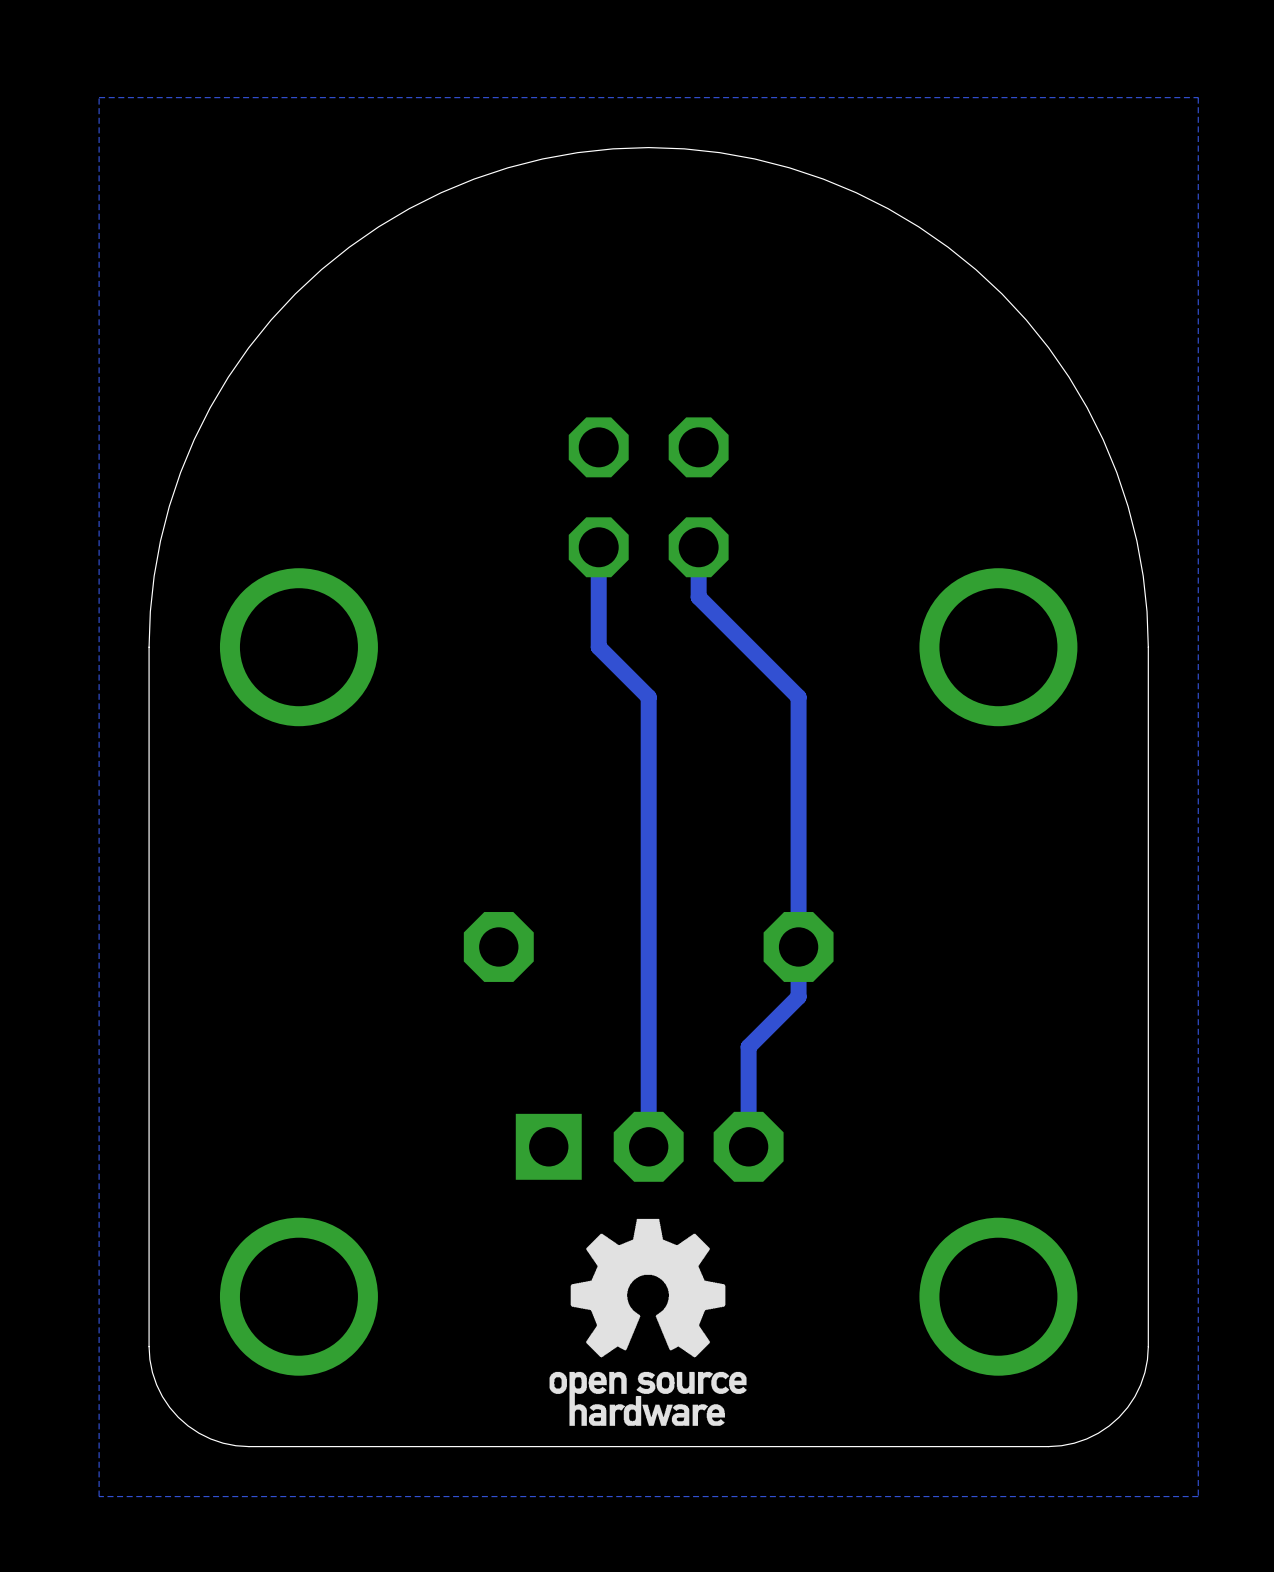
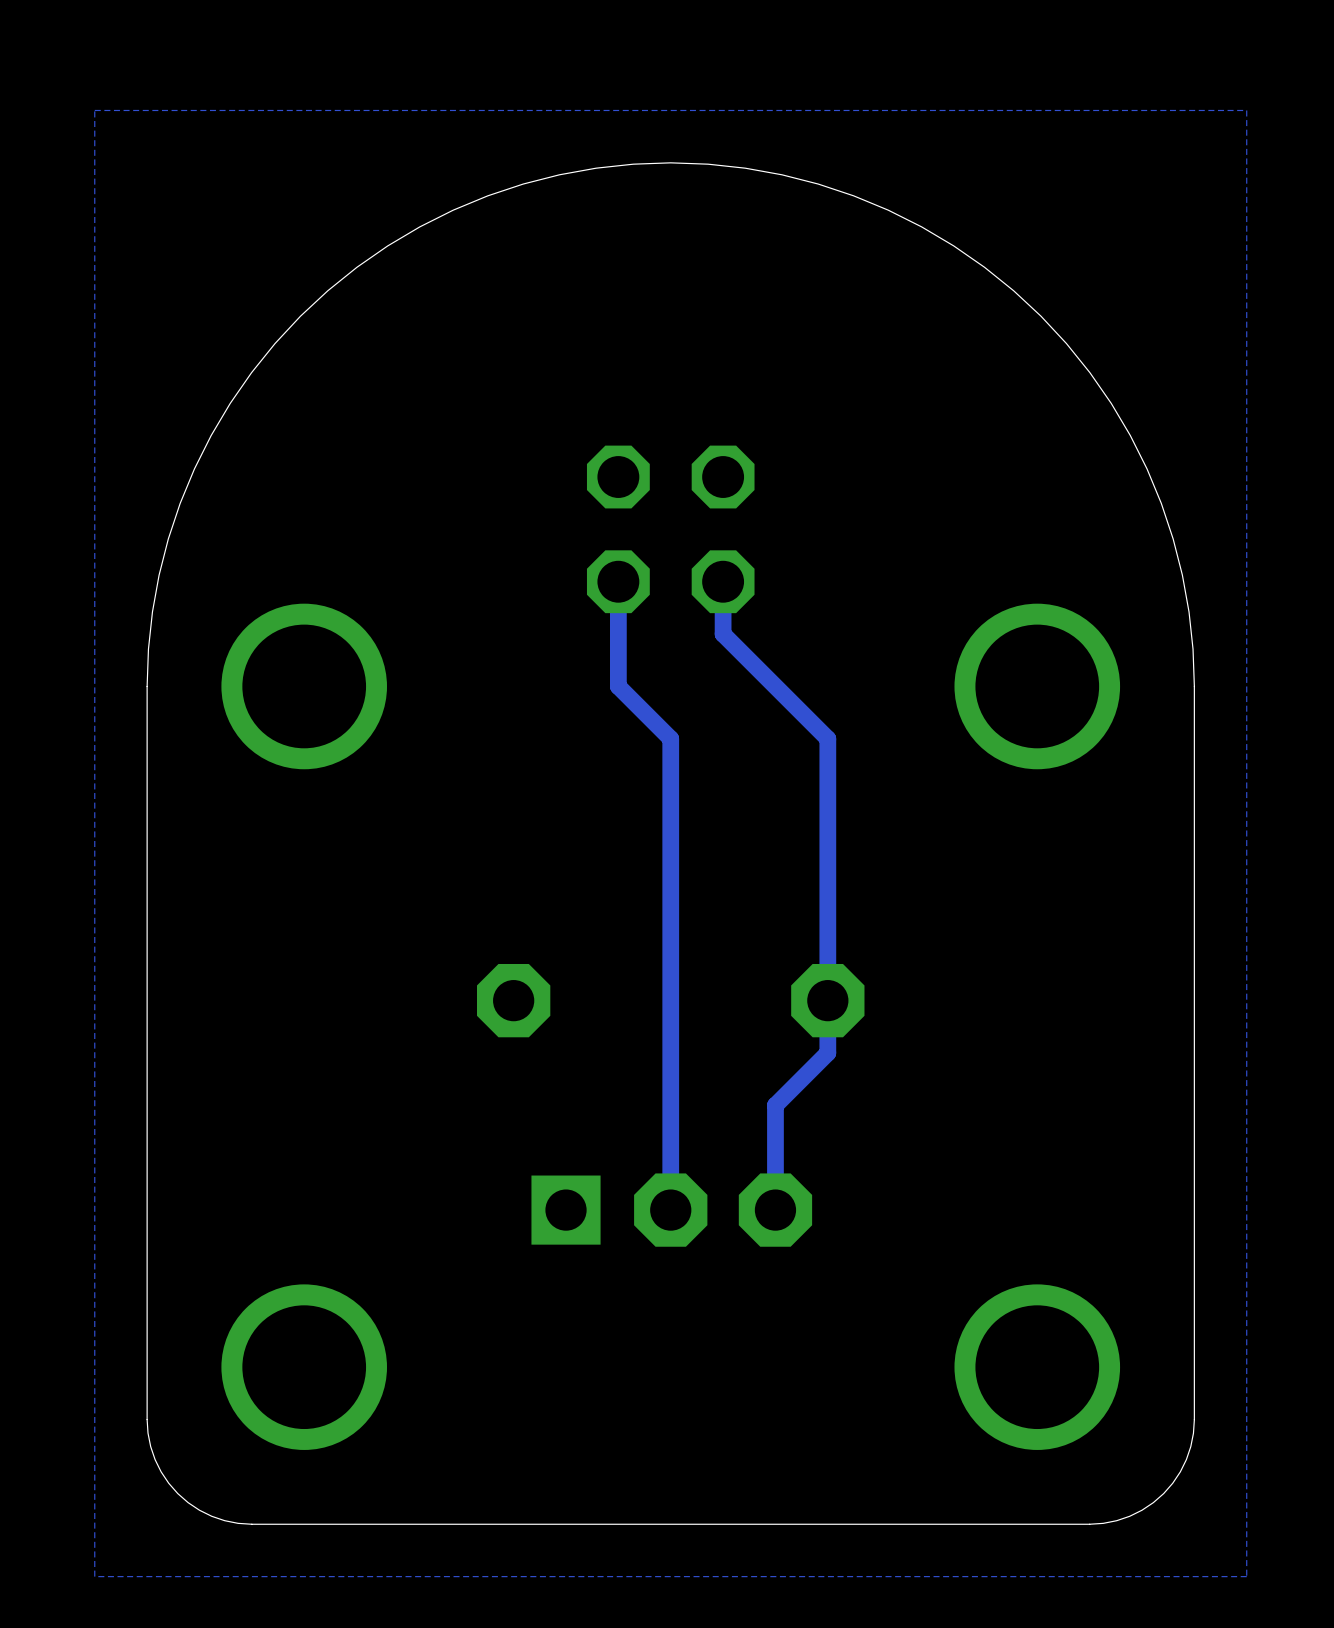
drawing: [549, 1218, 747, 1426] -> none

